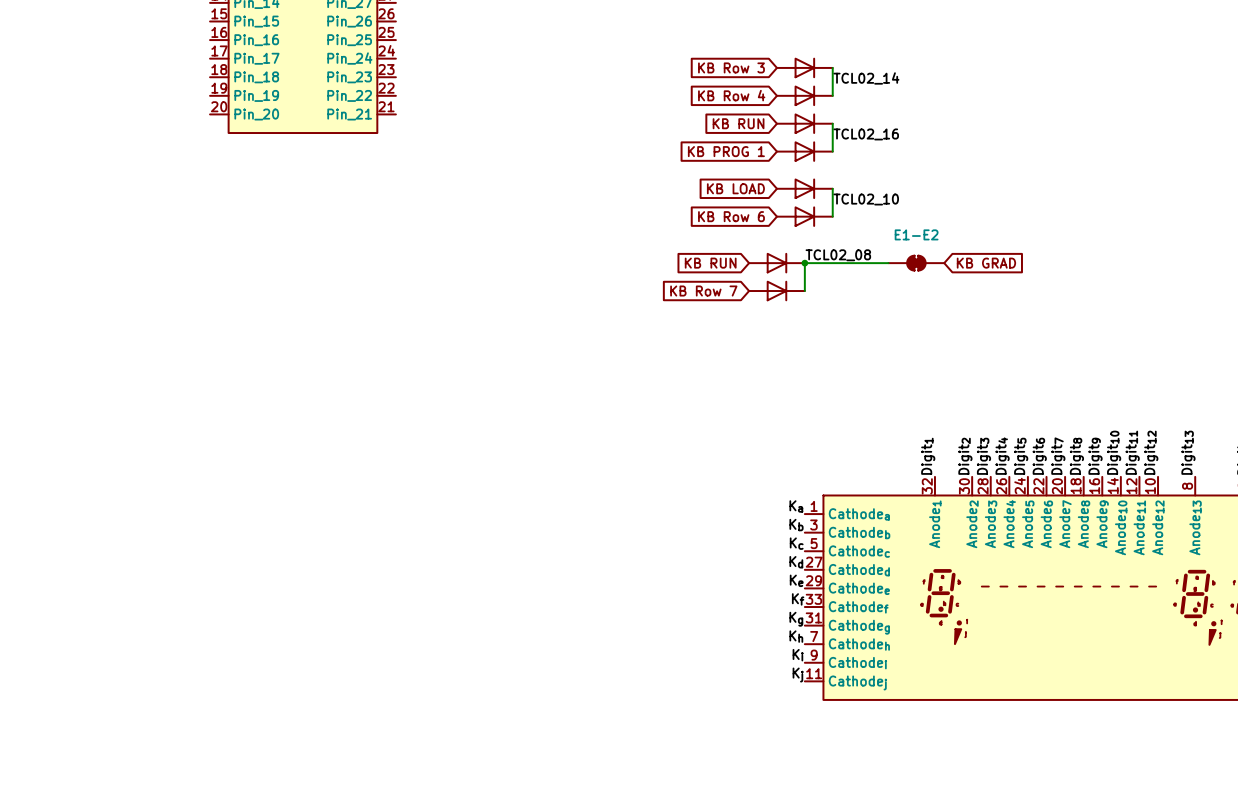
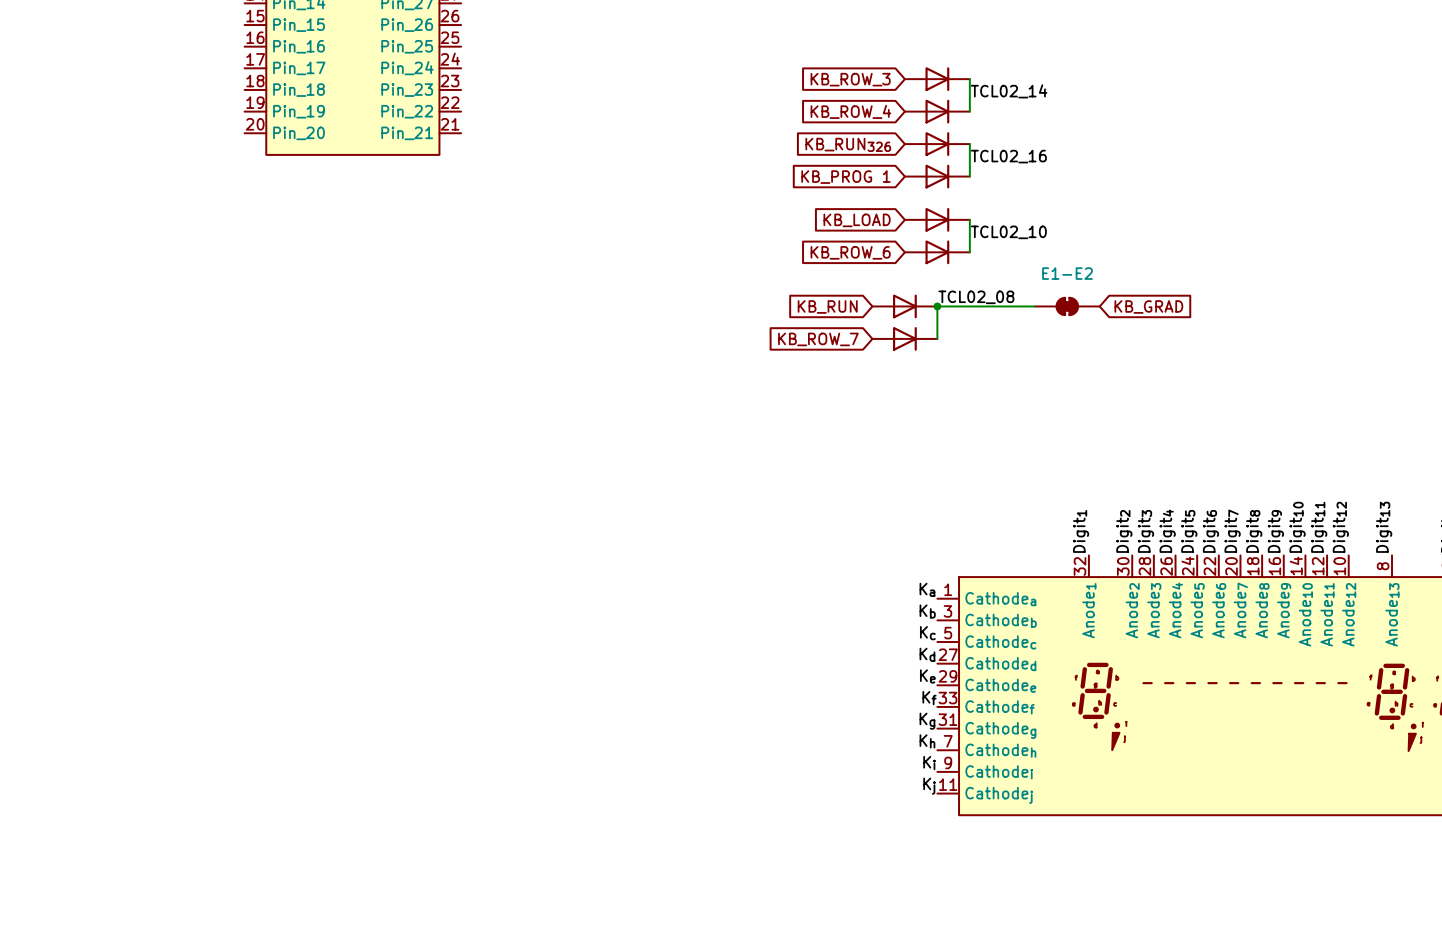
global label: KB Row 3 (731, 67) -> KB_ROW_3 (850, 79)
global label: KB Row 4 (731, 95) -> KB_ROW_4 (850, 111)
global label: KB RUN (738, 123) -> KB_RUN326 (848, 144)
global label: KB PROG 1 (726, 151) -> KB_PROG 1 (846, 177)
global label: KB LOAD (735, 188) -> KB_LOAD (857, 220)
global label: KB Row 6 (731, 216) -> KB_ROW_6 (850, 252)
global label: KB RUN (710, 263) -> KB_RUN (827, 306)
global label: KB GRAD (986, 263) -> KB_GRAD (1148, 306)
global label: KB Row 7 (703, 291) -> KB_ROW_7 (818, 339)

